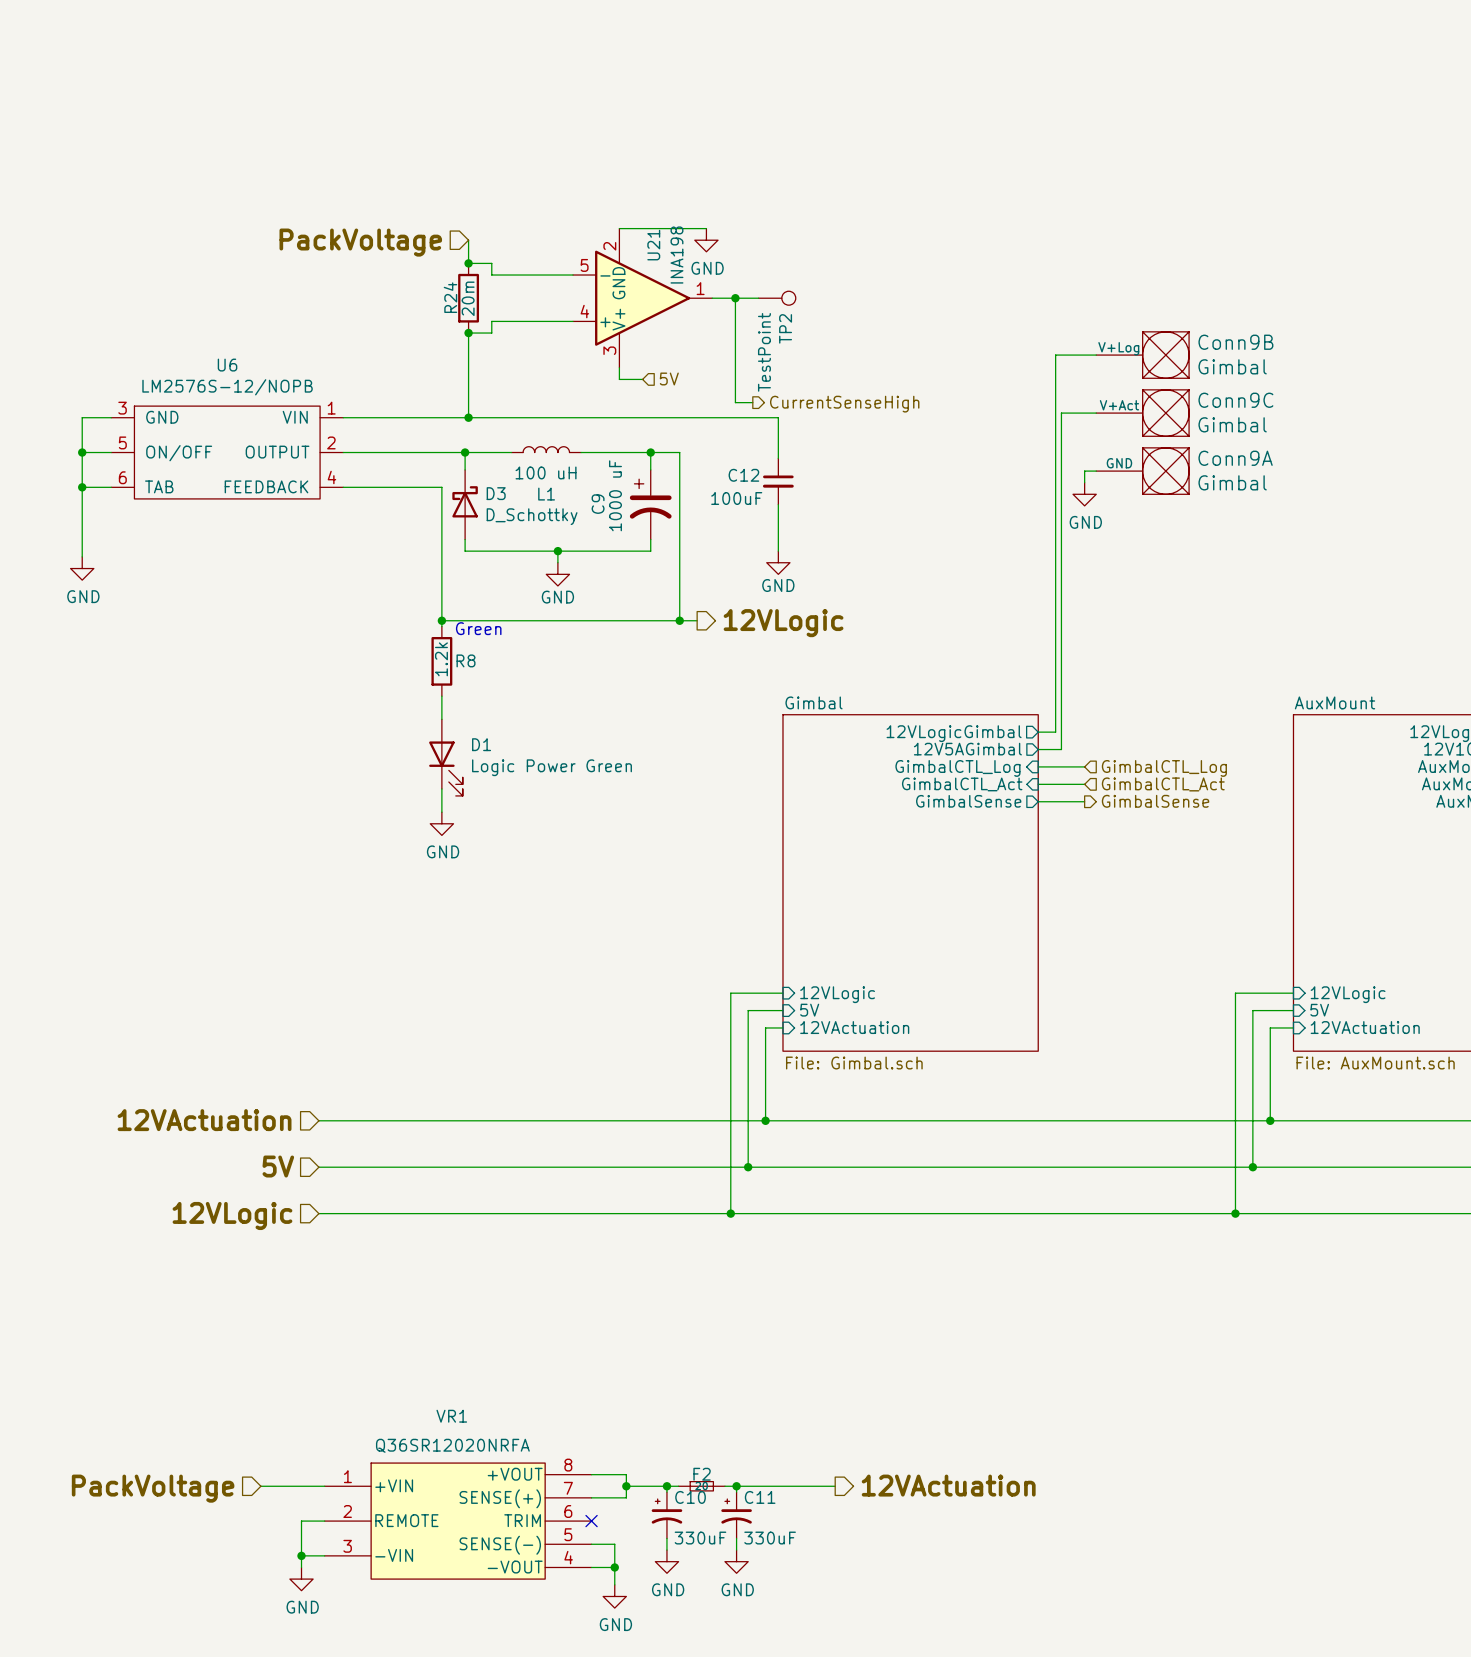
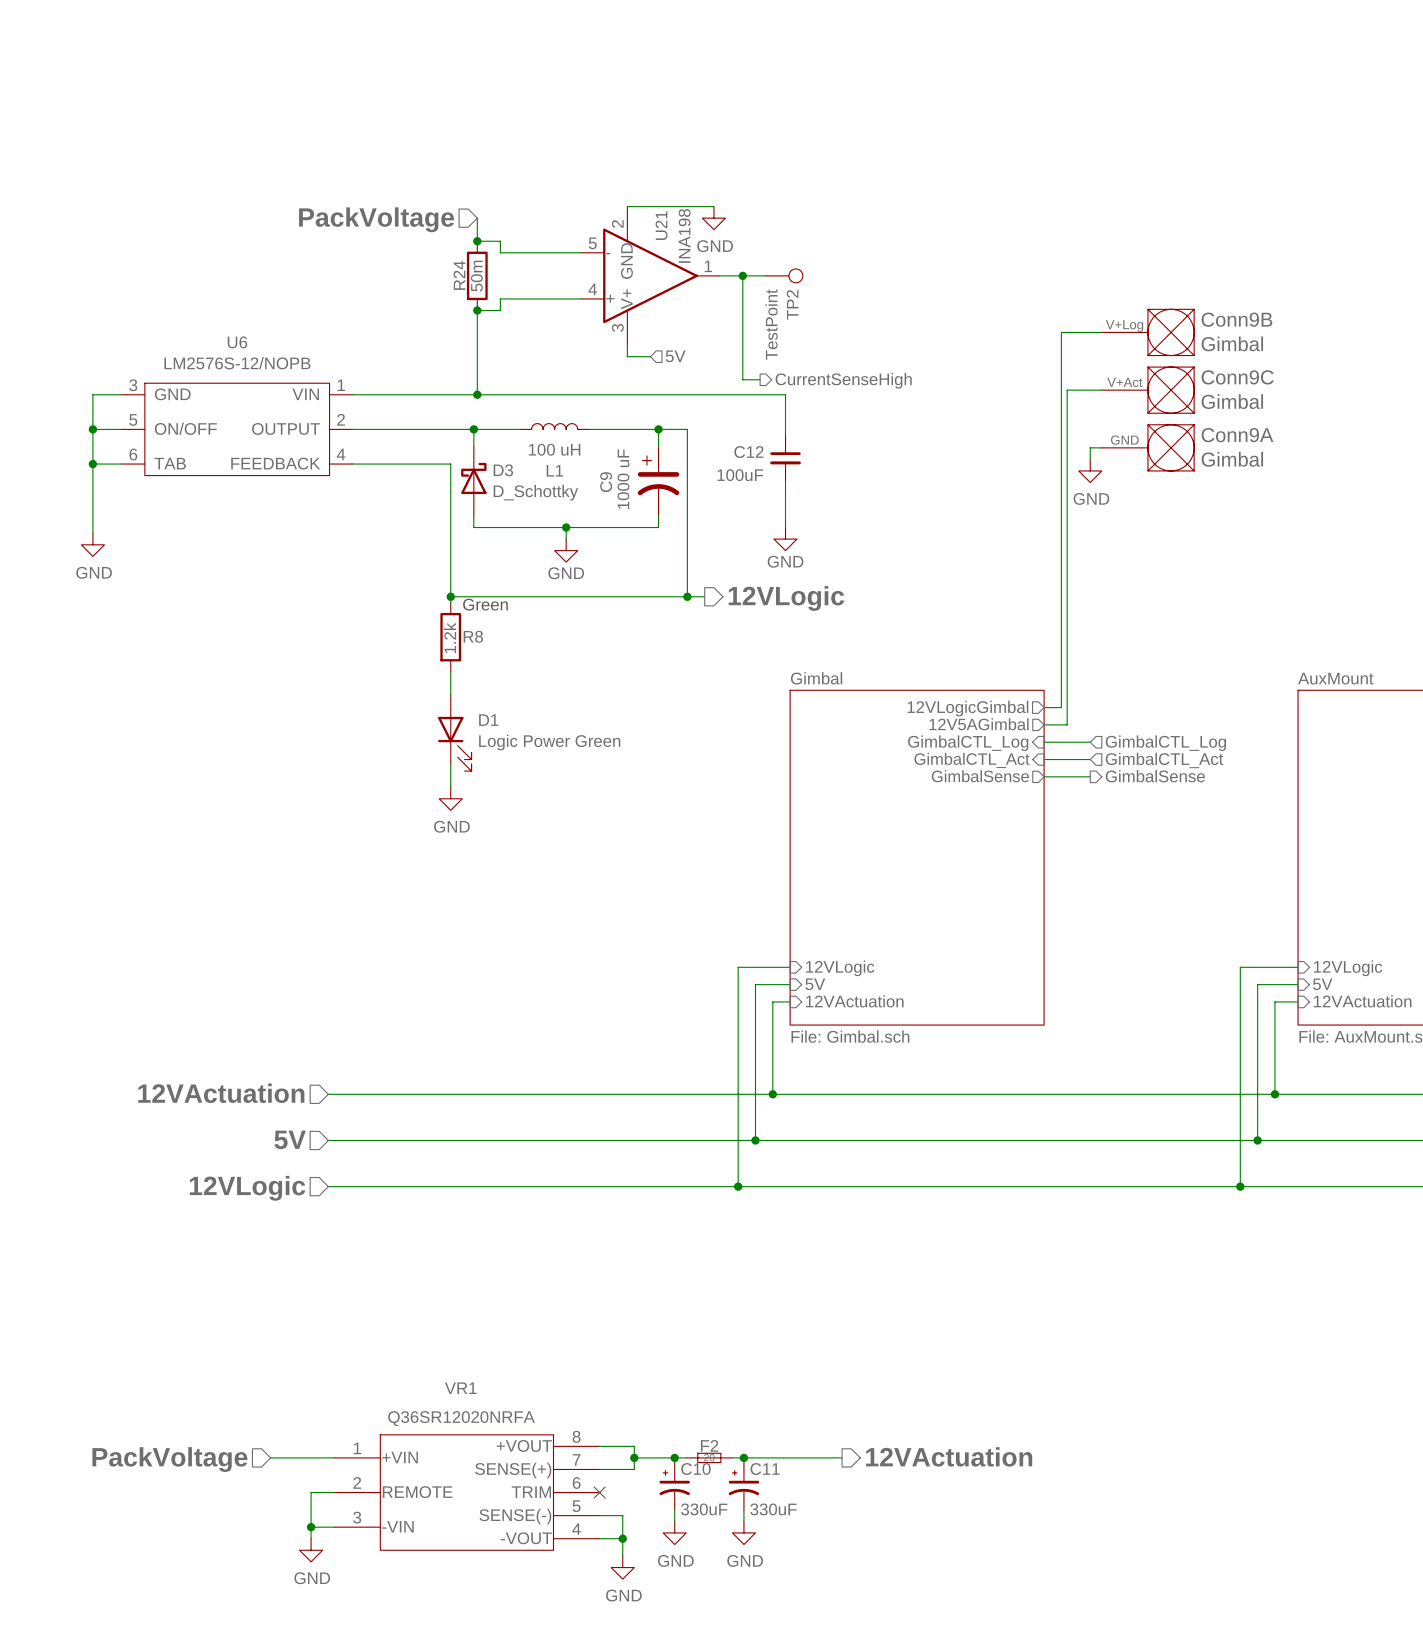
R24 value: 20m (468, 298) -> 50m (476, 276)

